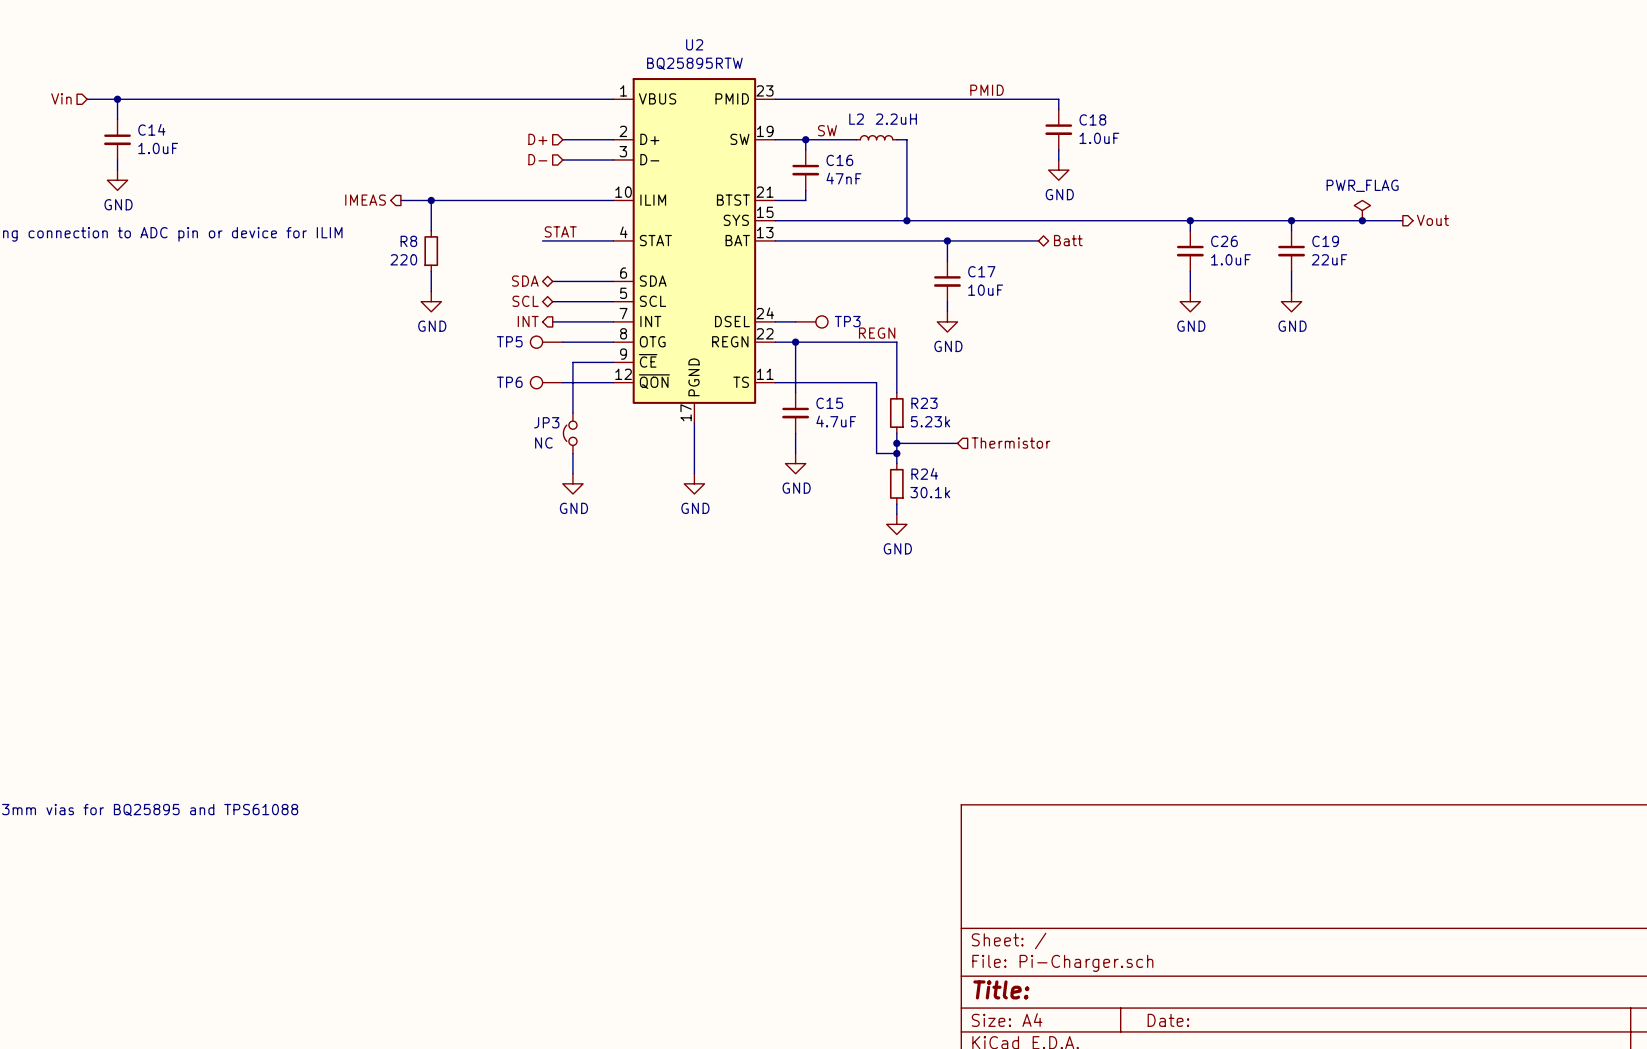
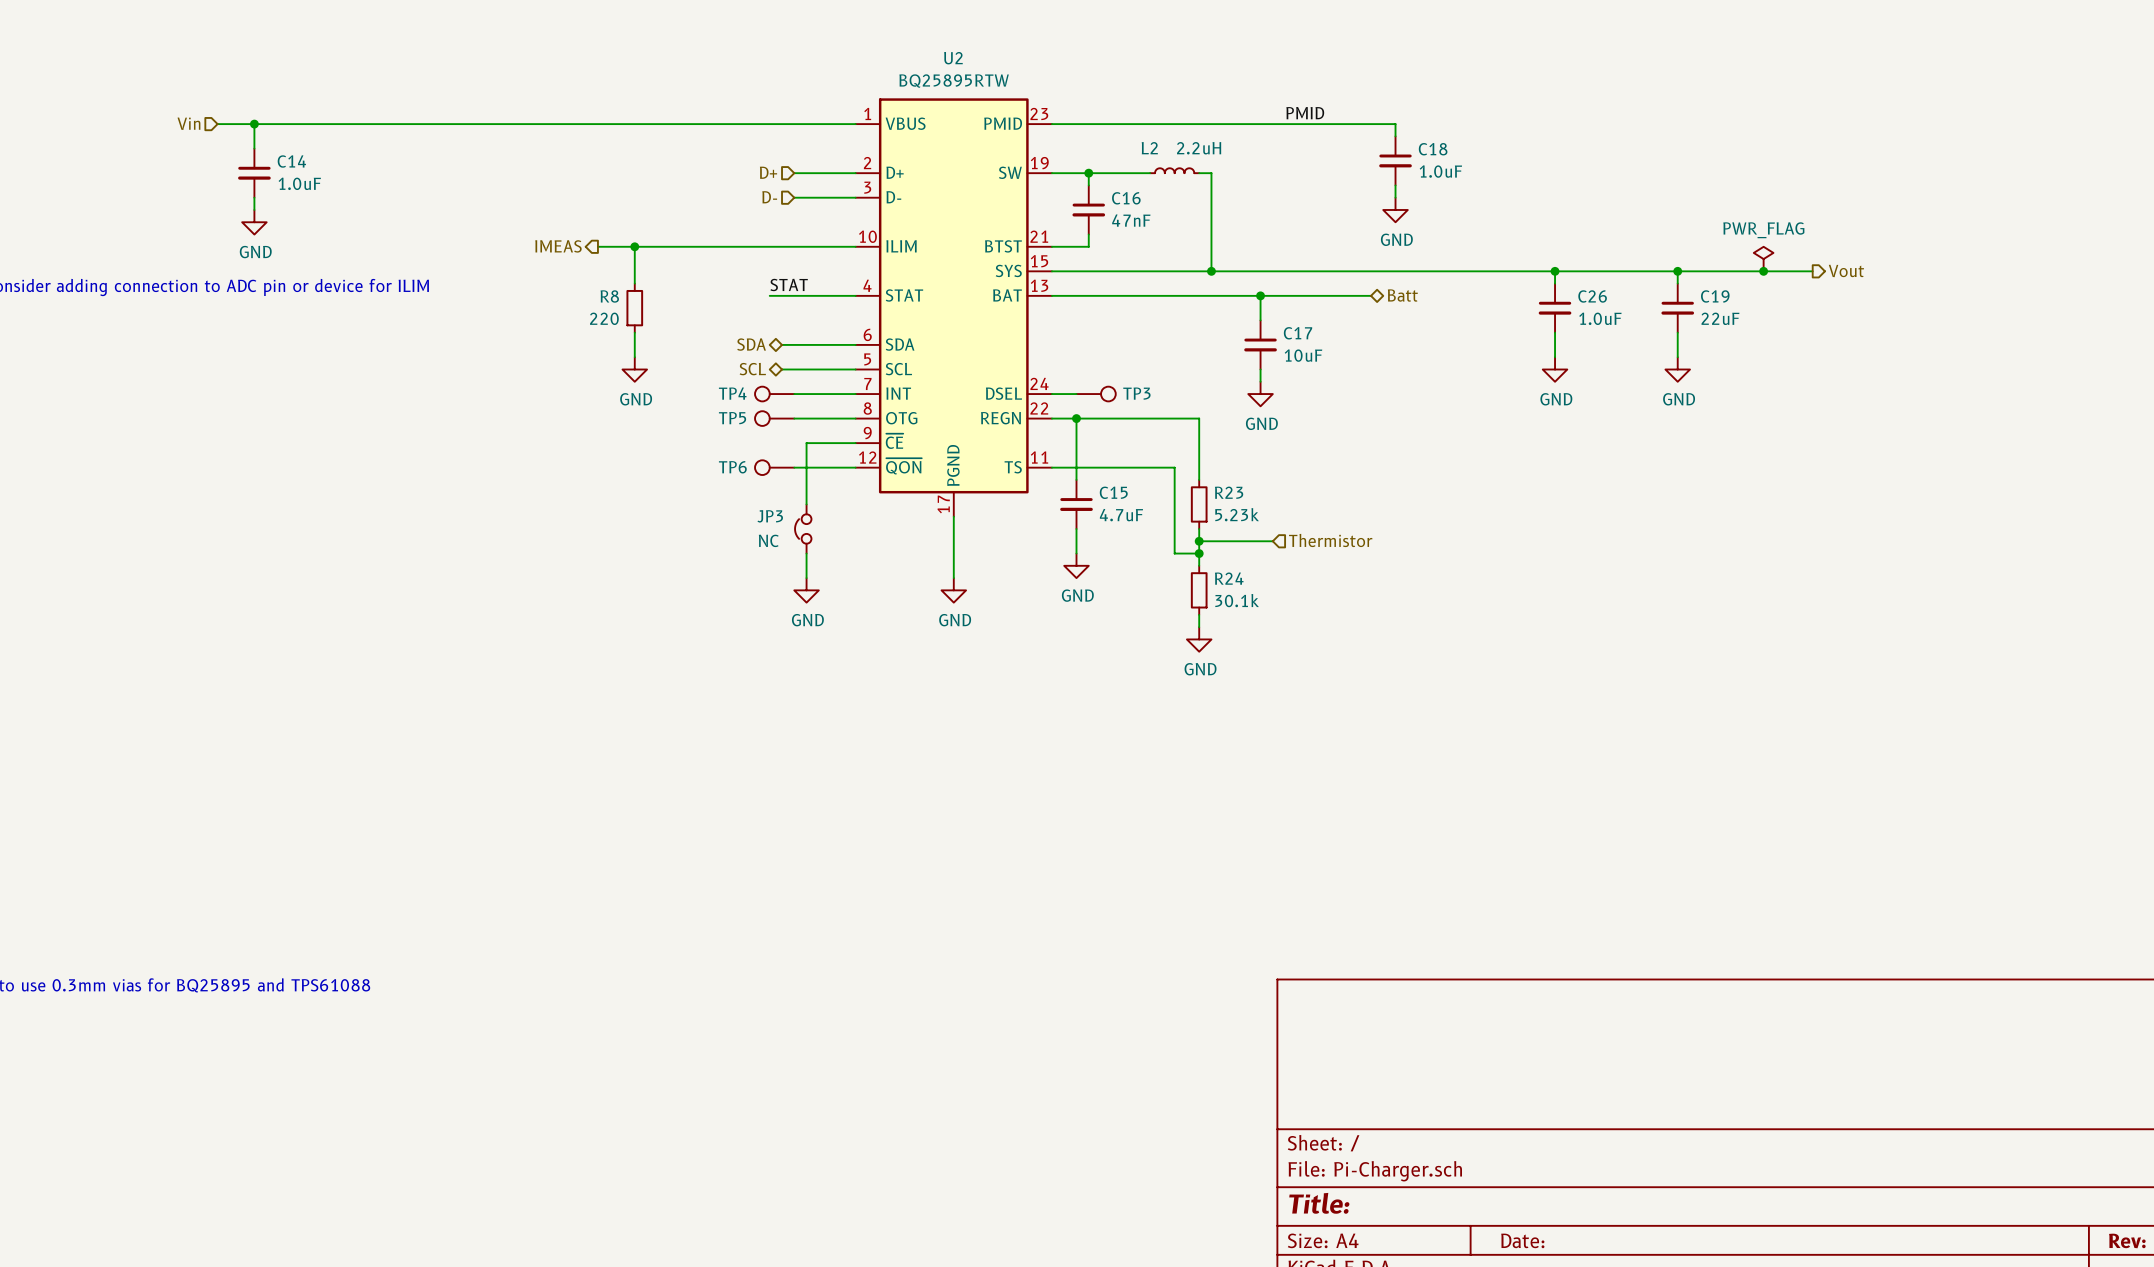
label: SW (827, 130) -> none
hierarchical label: INT (528, 321) -> none
TP4: none -> (774, 394)
label: REGN (877, 333) -> none

